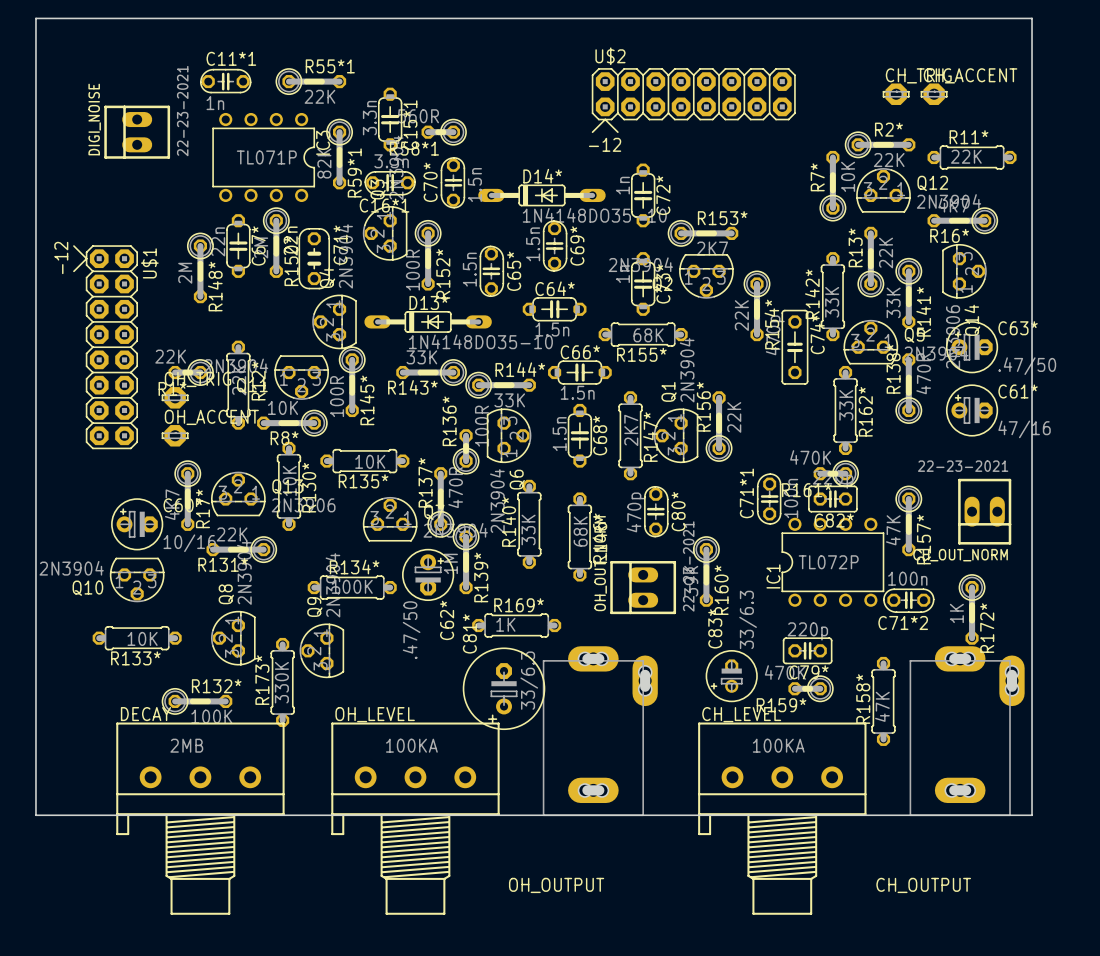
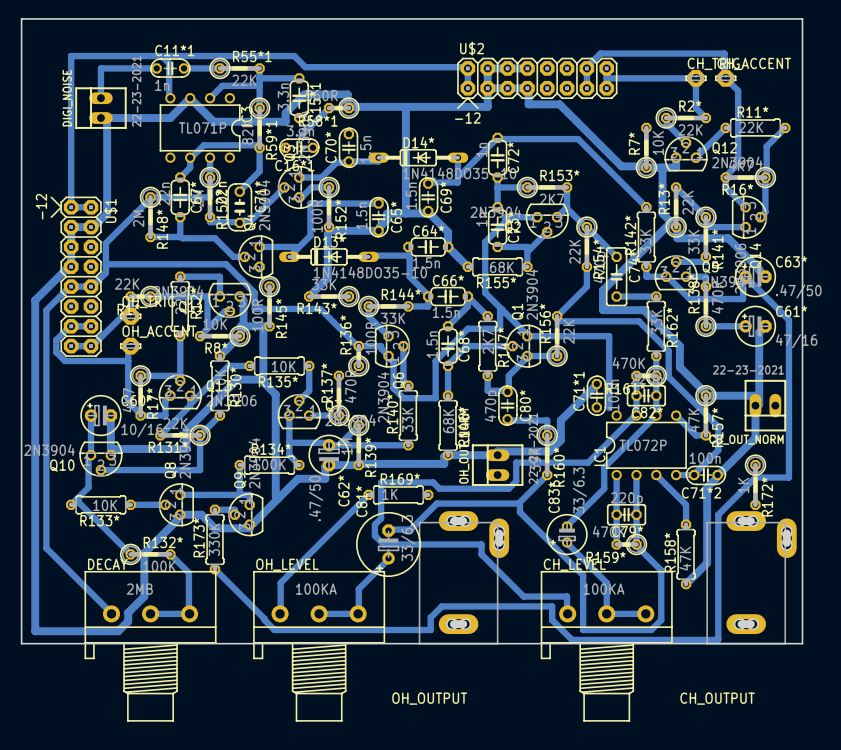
bottom track: none -> (163, 57) (165, 56) (294, 56) (305, 67) (465, 67) (467, 68) (467, 88)
bottom track: none -> (156, 68) (100, 68) (100, 98)
bottom track: none -> (184, 68) (219, 68)
bottom track: none -> (259, 68) (259, 108)
bottom track: none -> (527, 68) (487, 68) (487, 106) (348, 108) (347, 94) (304, 94) (285, 113) (285, 121) (213, 121) (190, 98) (170, 118) (100, 118) (107, 121) (107, 213) (94, 225) (71, 227) (71, 266) (67, 268) (35, 300) (35, 631) (118, 631) (128, 621) (128, 612) (144, 596) (144, 553) (179, 518) (180, 514) (201, 514) (214, 528) (249, 528) (249, 524) (253, 523) (298, 478) (325, 478) (325, 466) (329, 465) (444, 463) (444, 456) (448, 455) (497, 455) (497, 451) (549, 451) (560, 440) (560, 420) (596, 383)
bottom track: none -> (259, 78) (299, 78)
bottom track: none -> (606, 78) (695, 78) (695, 108) (705, 118)
bottom track: none -> (259, 85) (222, 85) (210, 98)
bottom track: none -> (487, 88) (527, 88) (528, 104) (559, 104) (621, 166) (676, 167) (676, 157)
bottom track: none -> (586, 88) (586, 68) (600, 53) (724, 53) (724, 75) (738, 90) (738, 163) (726, 175) (725, 187) (745, 207)
bottom track: none -> (170, 98) (169, 63) (161, 56) (71, 56) (71, 207) (91, 207)
bottom track: none -> (405, 106) (405, 213)
bottom track: none -> (329, 108) (301, 135)
bottom track: none -> (666, 125) (668, 125) (686, 142)
bottom track: none -> (725, 127) (695, 157)
bottom track: none -> (785, 127) (766, 146) (765, 212) (760, 217)
bottom track: none -> (210, 157) (210, 197) (150, 197) (105, 243) (105, 272) (91, 286) (68, 287) (46, 310) (46, 548) (112, 613)
bottom track: none -> (378, 157) (378, 161) (336, 162) (321, 177) (299, 177)
bottom track: none -> (457, 157) (457, 182) (428, 183)
bottom track: none -> (662, 167) (662, 213) (676, 227) (677, 238) (728, 238) (765, 276)
bottom track: none -> (457, 175) (460, 175) (497, 137) (578, 139) (646, 207)
bottom track: none -> (180, 177) (190, 167) (190, 157) (203, 145) (258, 145) (259, 171) (239, 191)
bottom track: none -> (497, 177) (497, 207)
bottom track: none -> (284, 187) (250, 220) (242, 220) (239, 222) (210, 222) (210, 217)
bottom track: none -> (329, 187) (311, 187) (301, 197) (299, 197)
bottom track: none -> (497, 187) (527, 187)
bottom track: none -> (567, 187) (567, 207) (557, 217)
bottom track: none -> (676, 187) (705, 217) (707, 227) (745, 227)
bottom track: none -> (378, 203) (310, 203) (310, 235) (289, 256)
bottom track: none -> (566, 207) (616, 256)
bottom track: none -> (180, 217) (180, 237)
bottom track: none -> (537, 217) (505, 217) (505, 222) (485, 241) (485, 292) (527, 336) (609, 336) (609, 408)
bottom track: none -> (671, 222) (603, 290) (603, 310) (643, 310) (679, 346) (679, 367) (704, 391) (705, 395) (754, 395) (755, 405)
bottom track: none -> (329, 230) (378, 230) (387, 219) (387, 213) (424, 213) (428, 211) (448, 232) (448, 246) (467, 266)
bottom track: none -> (329, 230) (327, 277) (309, 296)
bottom track: none -> (547, 232) (529, 249) (527, 249)
bottom track: none -> (150, 237) (180, 237)
bottom track: none -> (180, 237) (214, 238) (233, 256) (244, 256)
bottom track: none -> (259, 246) (295, 246) (297, 248)
bottom track: none -> (497, 246) (527, 246) (527, 266)
bottom track: none -> (368, 256) (408, 255) (409, 276) (428, 296) (428, 306) (408, 306)
bottom track: none -> (705, 256) (705, 261) (676, 261)
bottom track: none -> (105, 264) (226, 264) (254, 292) (254, 308) (320, 308) (356, 344) (381, 346) (381, 348) (393, 362) (393, 388) (403, 398) (435, 398) (435, 361) (467, 328) (500, 328) (500, 311) (501, 309)
bottom track: none -> (586, 266) (586, 286) (557, 316) (558, 321) (638, 321) (668, 351) (668, 377) (718, 426) (718, 450) (694, 475) (676, 475)
bottom track: none -> (646, 266) (646, 276) (668, 277) (689, 299) (743, 299) (743, 277) (745, 276) (788, 320) (788, 477) (755, 477) (718, 514) (718, 639) (572, 639) (552, 620) (552, 606) (441, 606) (430, 617) (430, 630) (274, 630) (214, 569)
bottom track: none -> (180, 276) (219, 276) (219, 296)
bottom track: none -> (686, 276) (705, 276) (705, 286)
bottom track: none -> (130, 296) (130, 316) (128, 310) (93, 344) (71, 346)
bottom track: none -> (150, 296) (207, 296) (207, 325) (209, 326)
bottom track: none -> (239, 296) (243, 300) (243, 326)
bottom track: none -> (616, 296) (656, 296)
bottom track: none -> (368, 306) (368, 316) (388, 336)
bottom track: none -> (229, 311) (224, 311) (200, 336)
bottom track: none -> (487, 316) (467, 296) (467, 306) (448, 326)
bottom track: none -> (91, 326) (68, 327) (56, 339) (56, 352) (64, 361) (128, 361)
bottom track: none -> (263, 326) (263, 379)
bottom track: none -> (269, 326) (241, 326) (239, 336) (219, 356)
bottom track: none -> (705, 326) (745, 326)
bottom track: none -> (765, 326) (759, 332) (759, 404) (755, 405)
bottom track: none -> (180, 336) (180, 380)
bottom track: none -> (130, 346) (128, 348) (128, 401) (140, 415) (165, 415) (165, 400) (170, 395)
bottom track: none -> (403, 346) (403, 380) (408, 385)
bottom track: none -> (512, 346) (465, 346) (448, 365) (448, 395)
bottom track: none -> (557, 356) (527, 356) (508, 375) (507, 391) (487, 390) (487, 375)
bottom track: none -> (656, 356) (656, 415) (604, 467) (604, 488) (567, 526)
bottom track: none -> (249, 365) (228, 365) (192, 401) (190, 401)
bottom track: none -> (309, 365) (309, 390) (299, 400)
bottom track: none -> (140, 375) (180, 375)
bottom track: none -> (636, 375) (636, 415) (588, 462) (516, 462) (516, 481) (508, 488) (439, 488) (433, 482) (381, 482) (381, 518) (374, 524) (374, 535) (383, 544) (481, 544) (481, 554) (523, 596) (567, 596) (568, 613)
bottom track: none -> (263, 379) (237, 379) (186, 430) (186, 449) (110, 449)
bottom track: none -> (263, 379) (275, 394) (275, 496) (278, 498)
bottom track: none -> (190, 395) (190, 405) (160, 435)
bottom track: none -> (755, 405) (755, 437) (707, 487) (707, 563) (686, 584)
bottom track: none -> (91, 415) (88, 487) (71, 504)
bottom track: none -> (110, 415) (110, 455)
bottom track: none -> (219, 415) (200, 435) (200, 470) (100, 470)
bottom track: none -> (289, 415) (289, 455) (299, 465)
bottom track: none -> (309, 415) (338, 415)
bottom track: none -> (676, 415) (695, 435) (705, 435)
bottom track: none -> (507, 419) (547, 420) (547, 435)
bottom track: none -> (358, 425) (338, 445) (329, 445) (327, 442) (289, 442)
bottom track: none -> (340, 443) (342, 445) (408, 445)
bottom track: none -> (239, 465) (239, 494)
bottom track: none -> (547, 475) (518, 503)
bottom track: none -> (616, 475) (616, 544)
bottom track: none -> (636, 475) (636, 544) (661, 570) (661, 620) (651, 630) (583, 630) (583, 575) (519, 512) (518, 503)
bottom track: none -> (656, 475) (686, 504) (686, 524)
bottom track: none -> (180, 494) (249, 494) (249, 504)
bottom track: none -> (368, 494) (280, 582) (280, 613)
bottom track: none -> (76, 499) (130, 554)
bottom track: none -> (518, 503) (436, 503) (410, 529) (388, 530)
bottom track: none -> (130, 504) (165, 504)
bottom track: none -> (214, 509) (234, 509) (234, 514)
bottom track: none -> (567, 542) (606, 582) (606, 613) (646, 613)
bottom track: none -> (170, 554) (188, 572) (188, 613)
bottom track: none -> (388, 558) (358, 589) (358, 613) (319, 613)
bottom track: none -> (150, 613) (190, 613)

